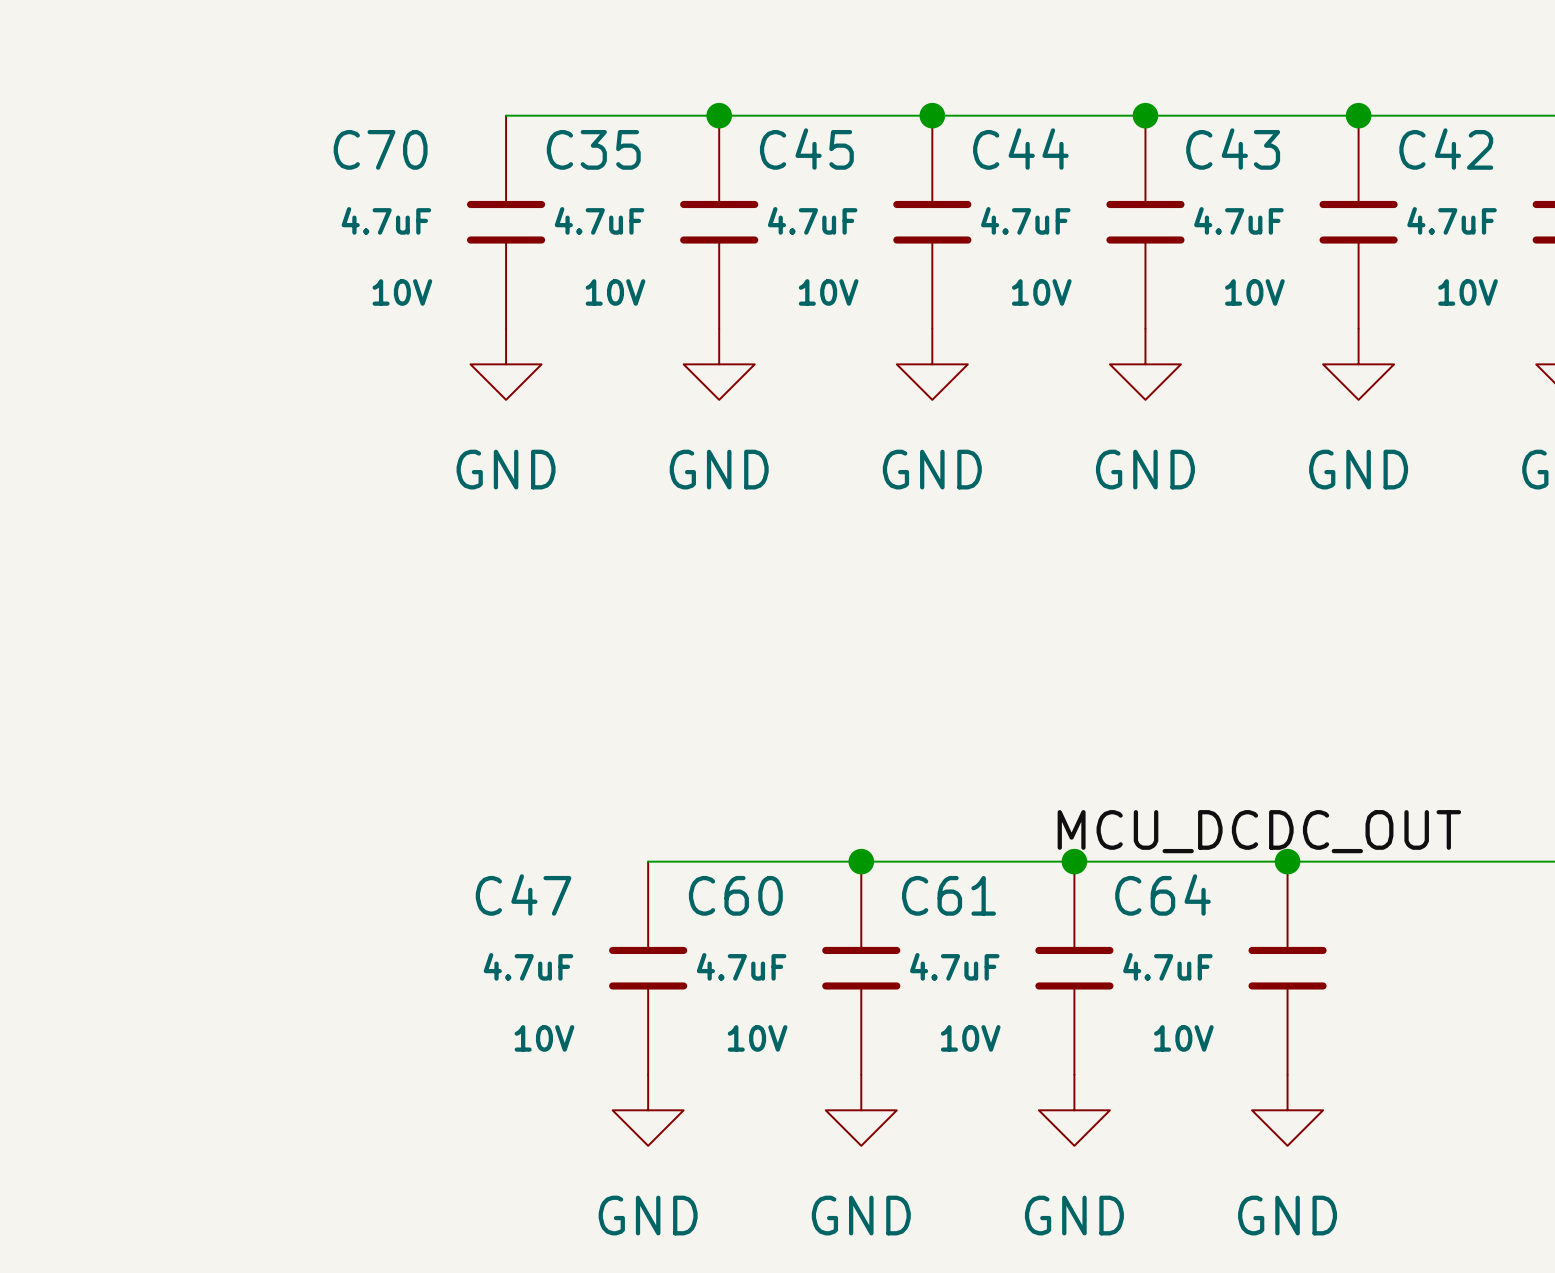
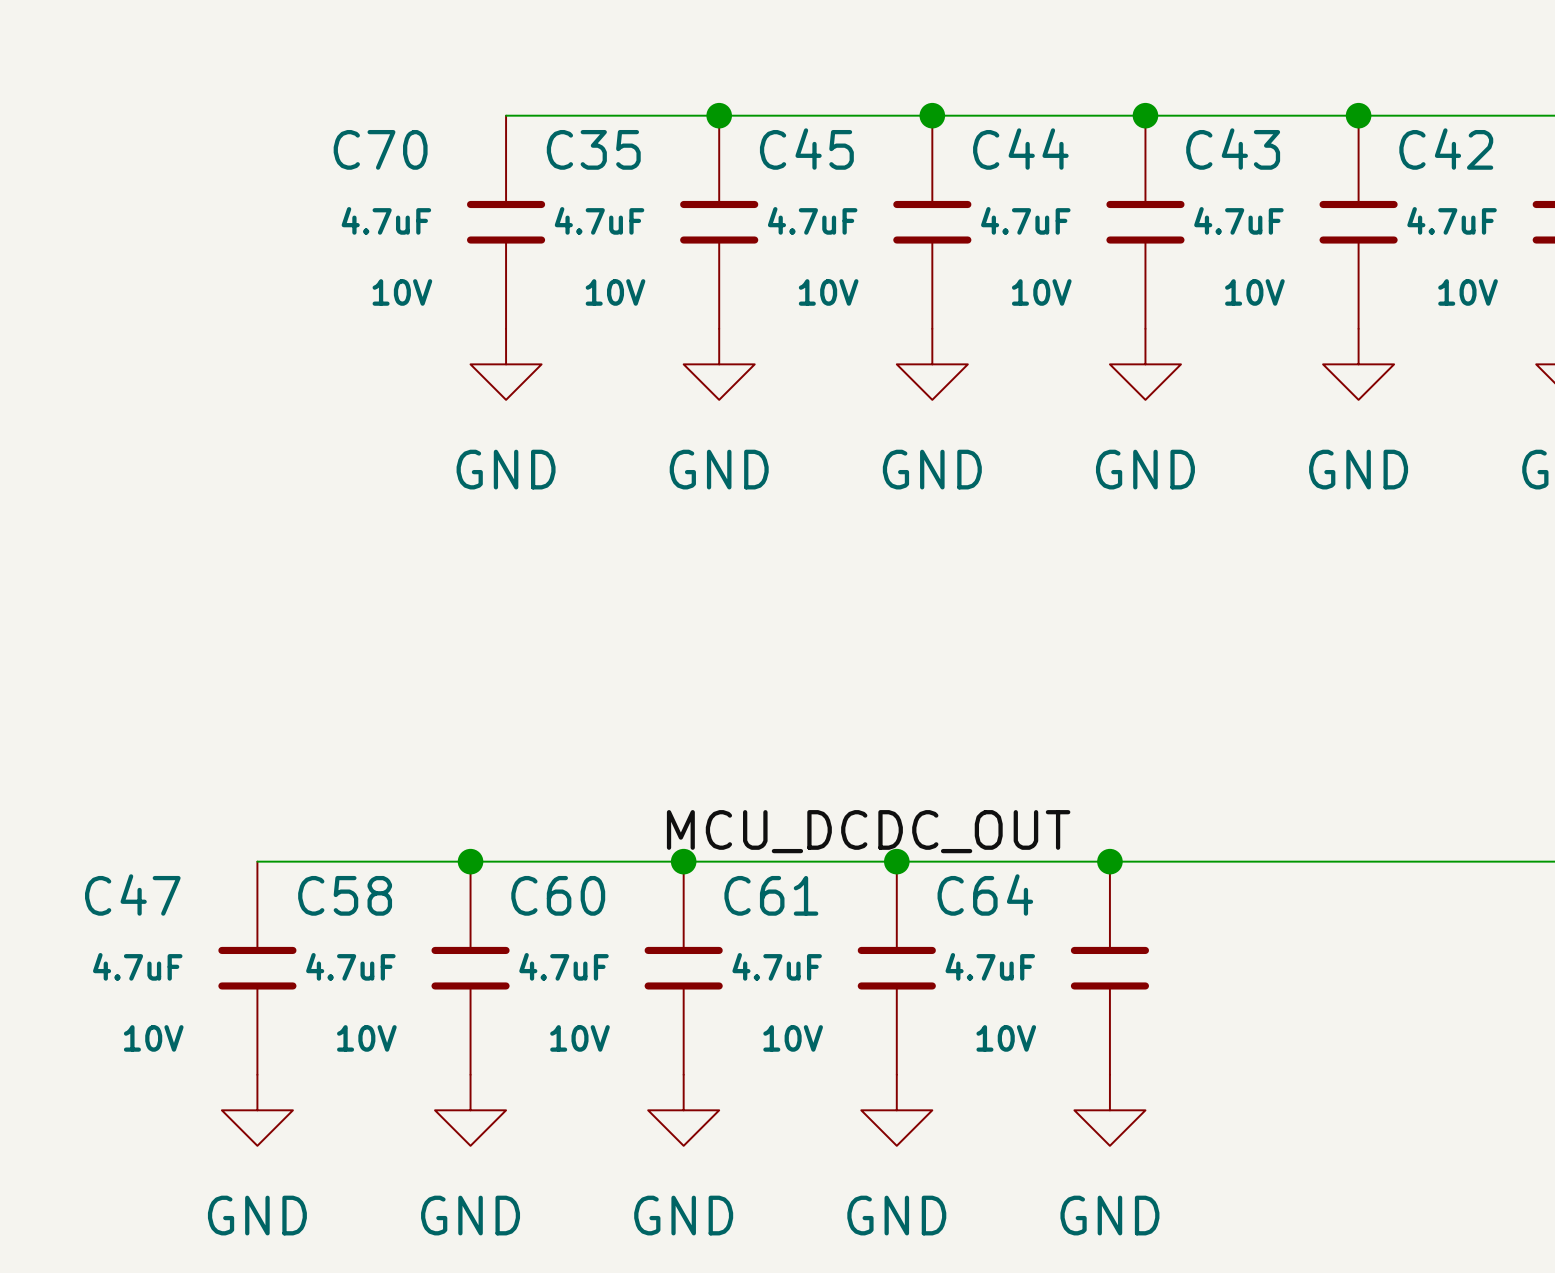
label position: MCU_DCDC_OUT (1259, 831) -> MCU_DCDC_OUT (868, 831)
wire: none -> (257, 861) (648, 861)
junction: none -> (470, 861)
junction: none -> (683, 861)
junction position: (861, 861) -> (896, 861)
junction position: (1074, 861) -> (1109, 861)
junction: (1287, 861) -> none
C58: none -> 4.7uF (470, 968)
C47 position: (648, 968) -> (257, 968)
C60 position: (861, 968) -> (683, 968)
C61 position: (1074, 968) -> (896, 968)
C64 position: (1287, 968) -> (1109, 968)
power symbol: none -> GND (257, 1110)
power symbol: none -> GND (470, 1110)
power symbol position: GND (648, 1110) -> GND (683, 1110)
power symbol position: GND (861, 1110) -> GND (896, 1110)
power symbol position: GND (1074, 1110) -> GND (1109, 1110)
power symbol: GND (1287, 1110) -> none

